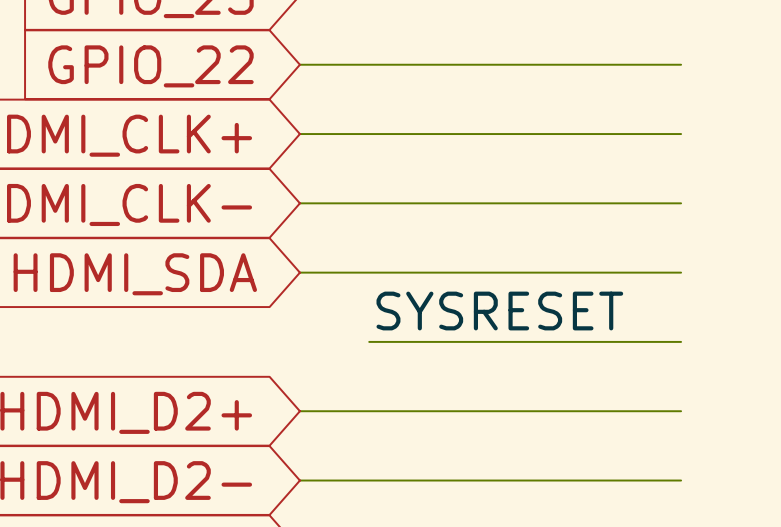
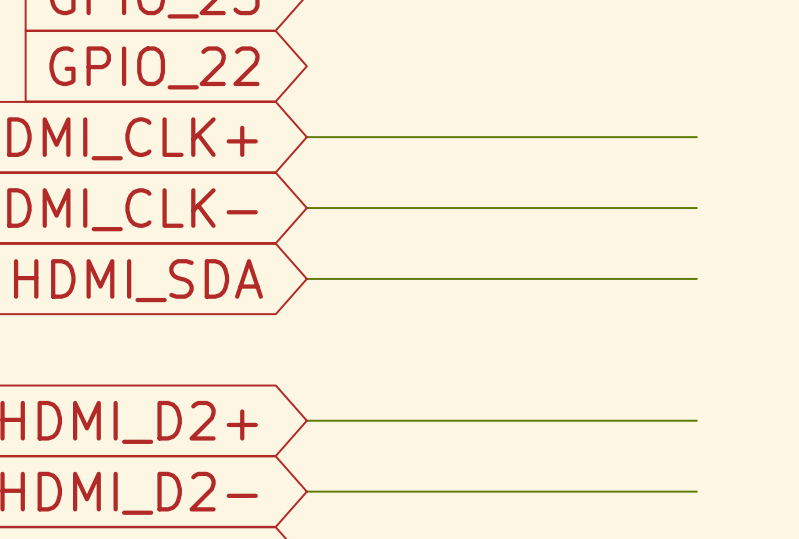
wire: (299, 64) (681, 64) -> none
label: SYSRESET (499, 311) -> none
wire: (369, 341) (681, 341) -> none

